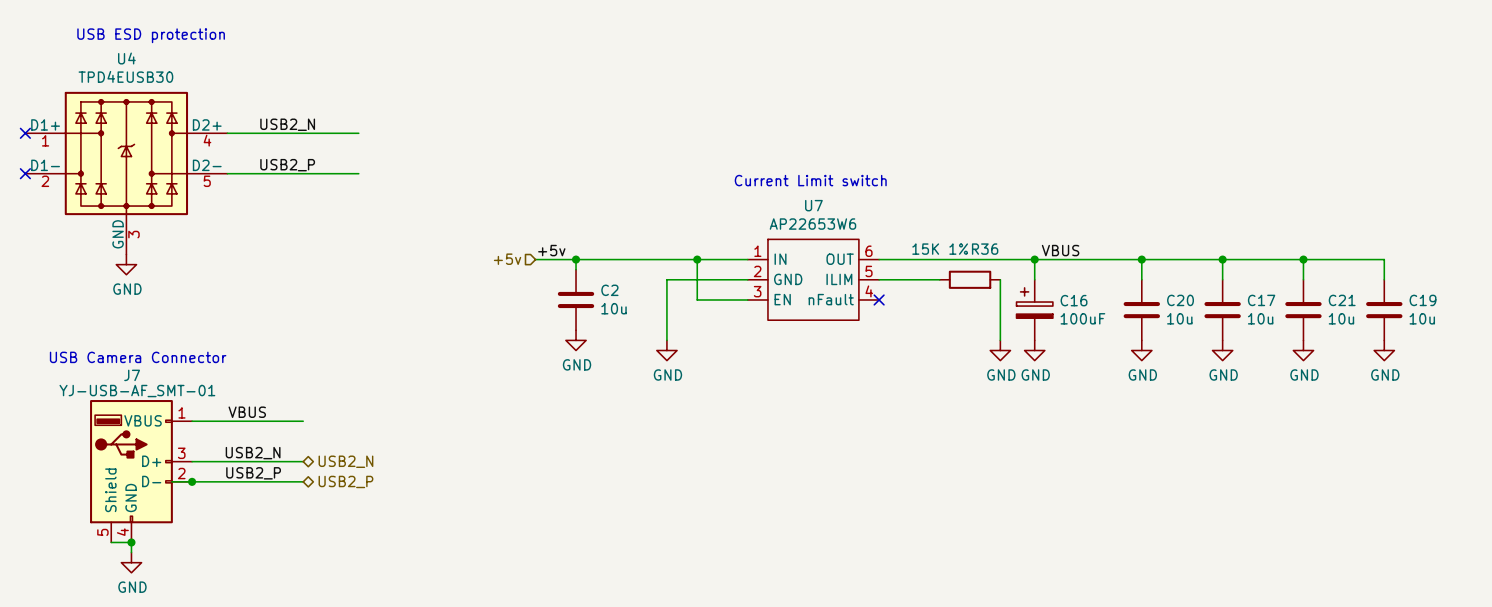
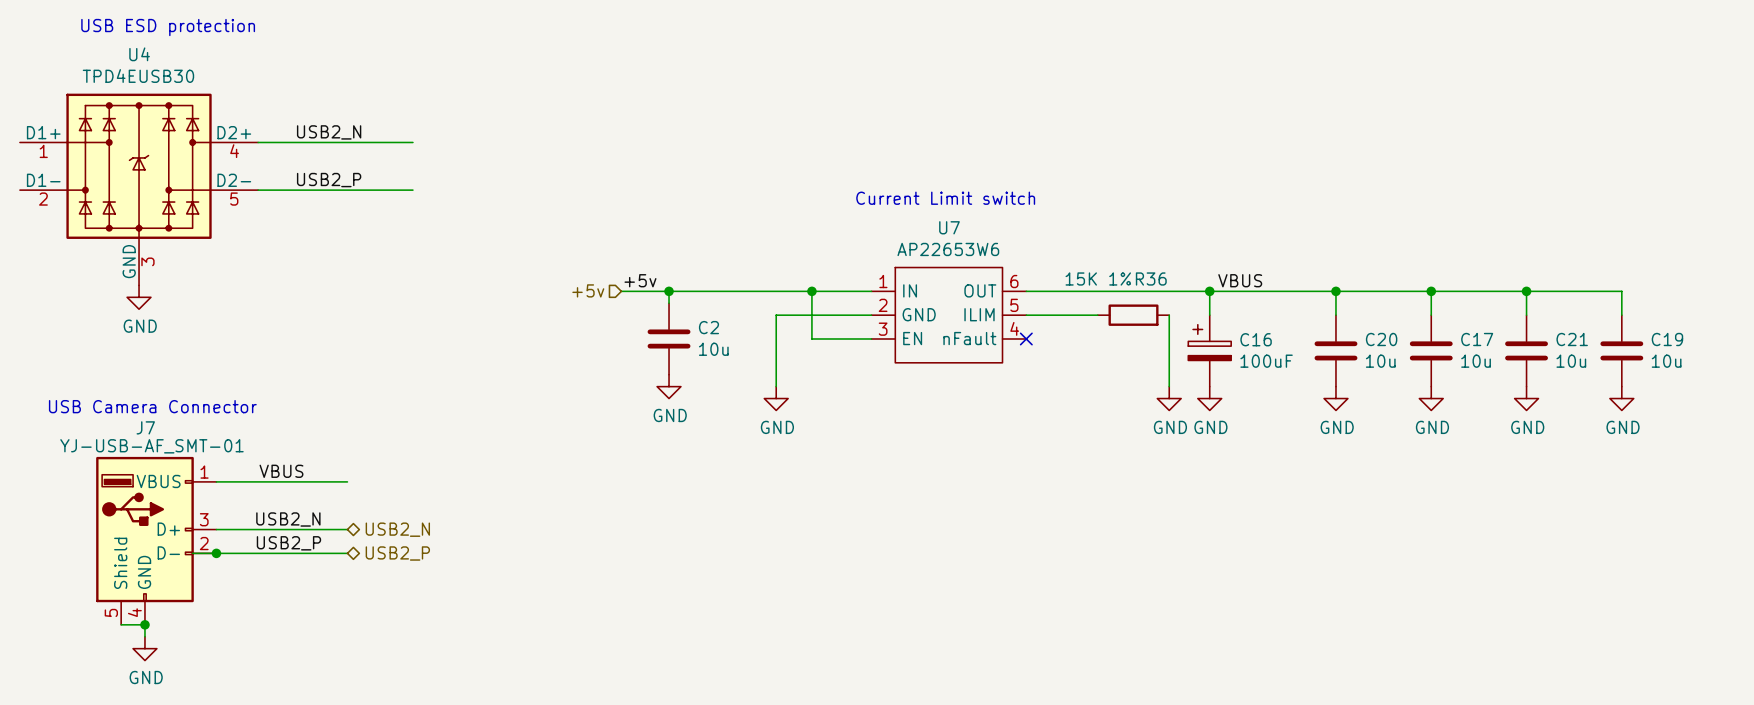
no-connect mark: (25, 133) -> none
no-connect mark: (25, 173) -> none

